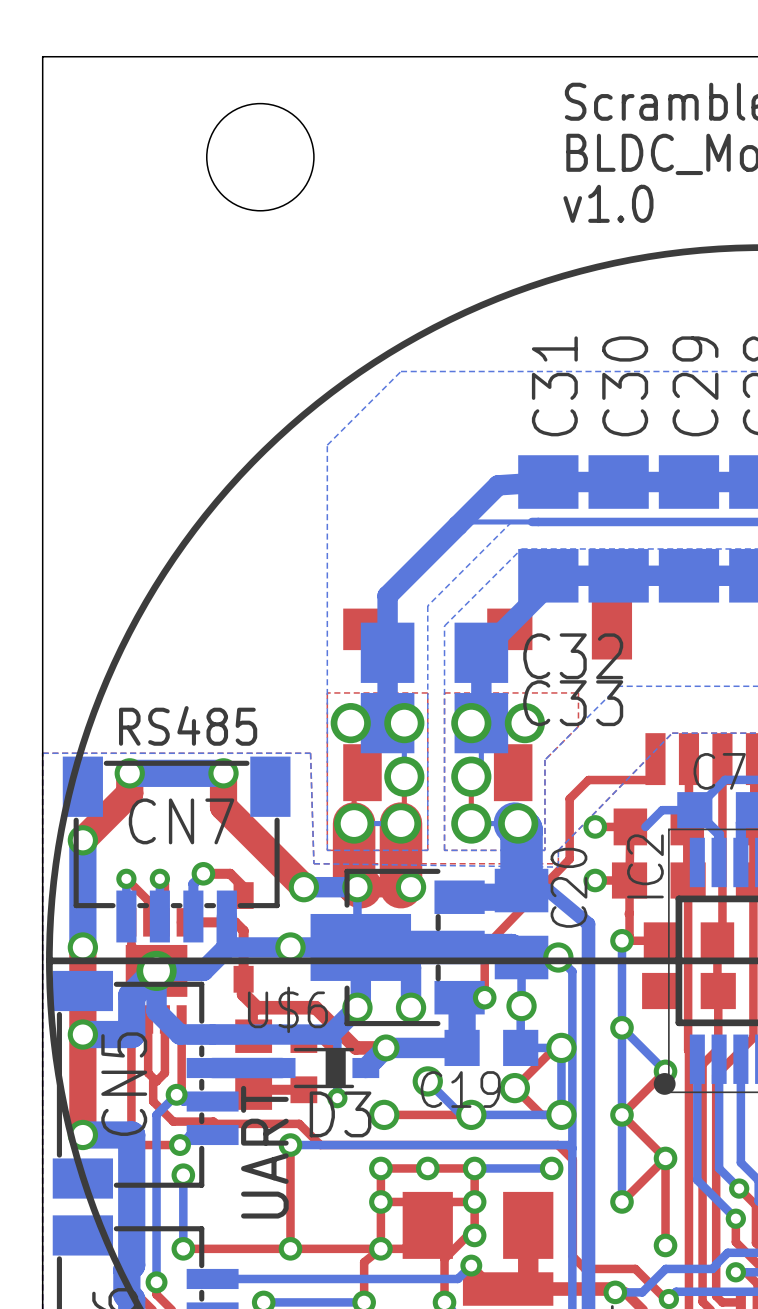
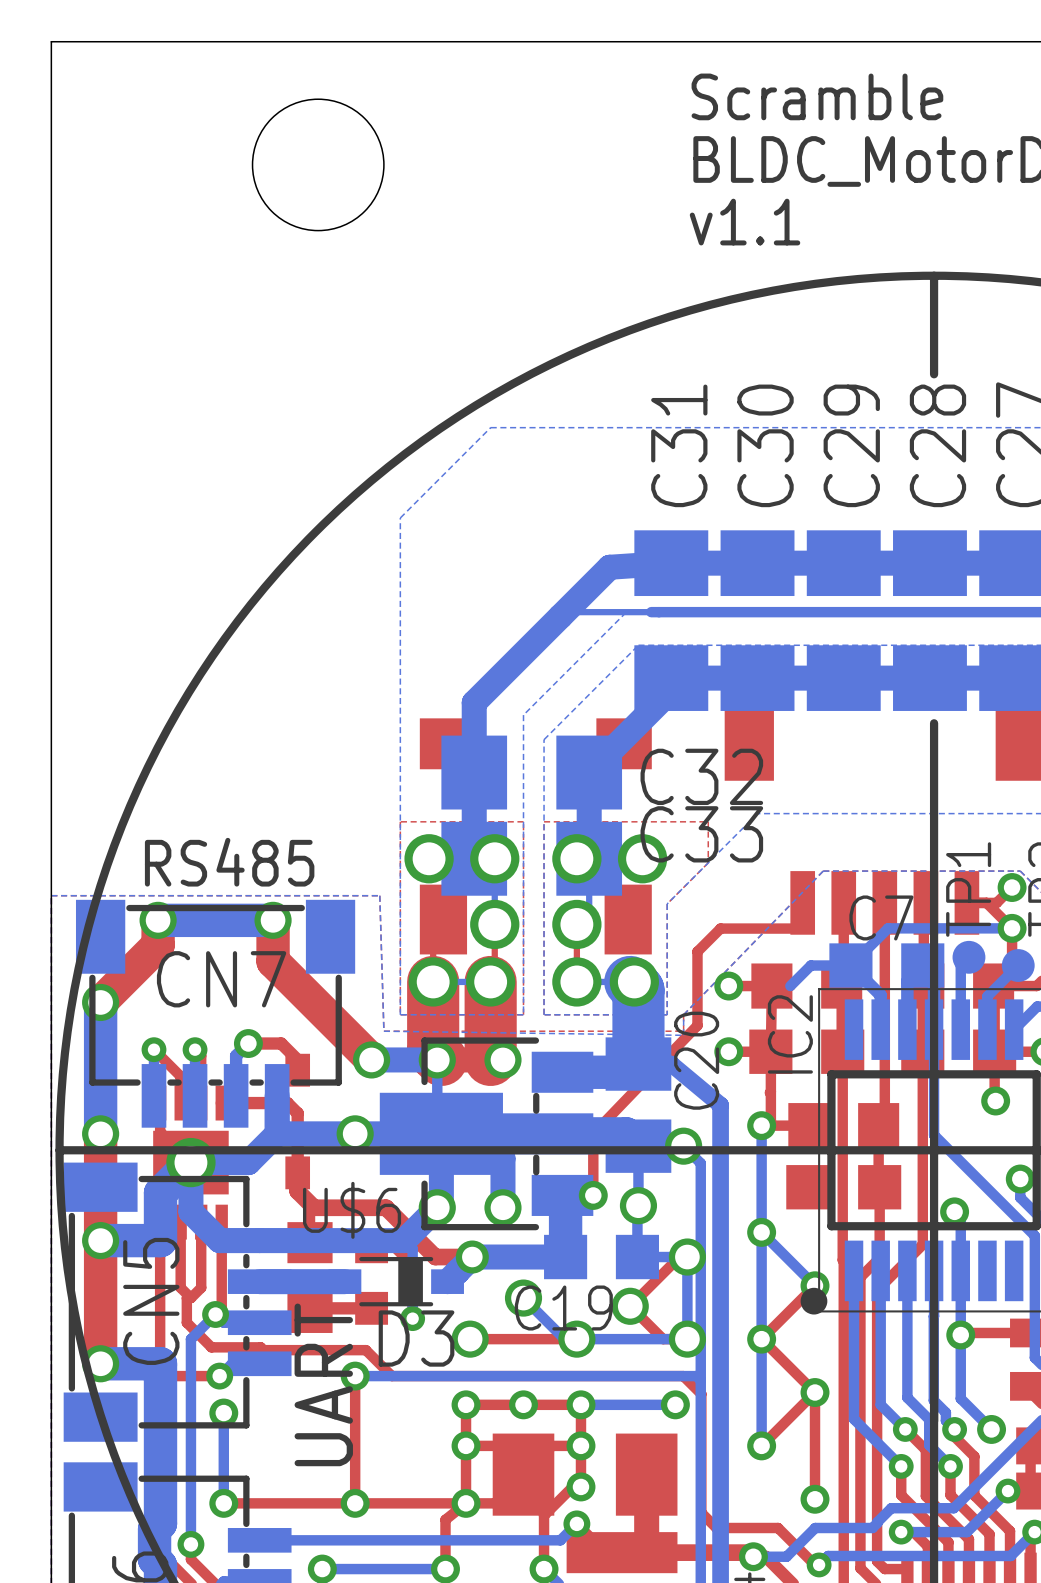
text: v1.0 (608, 203) -> v1.1 (745, 222)

